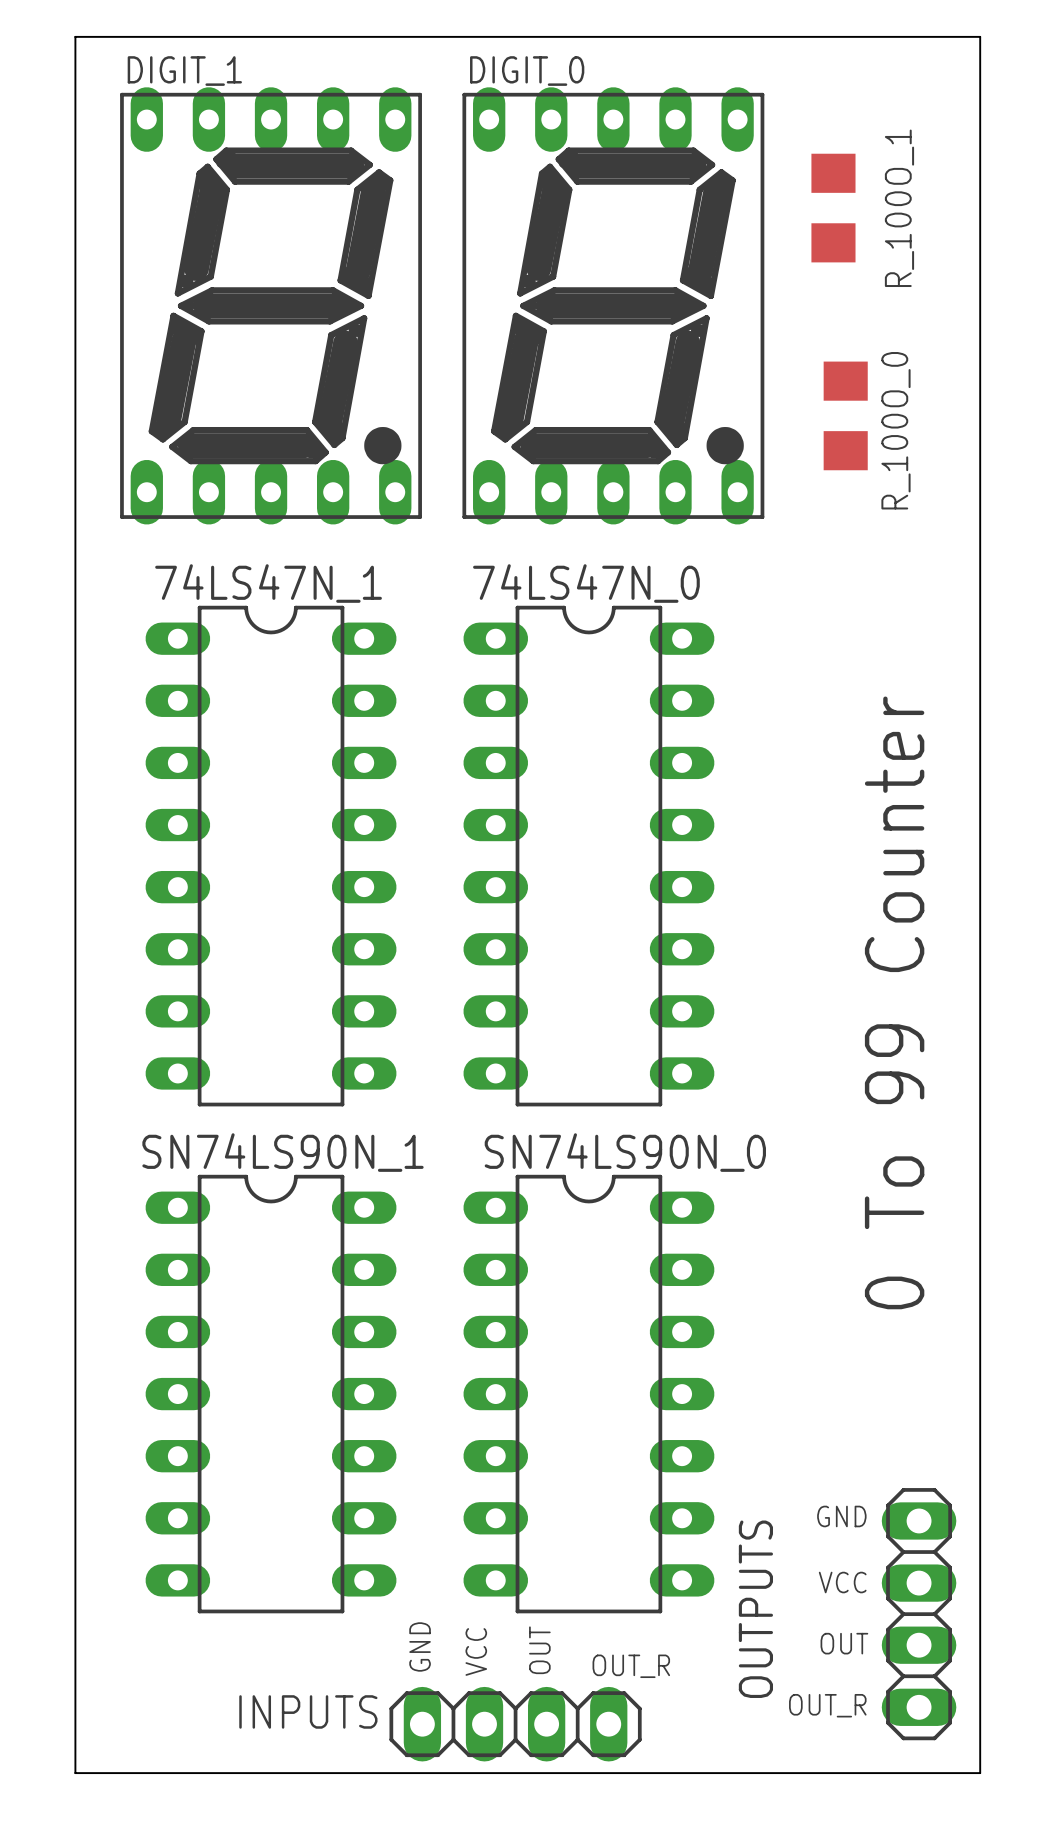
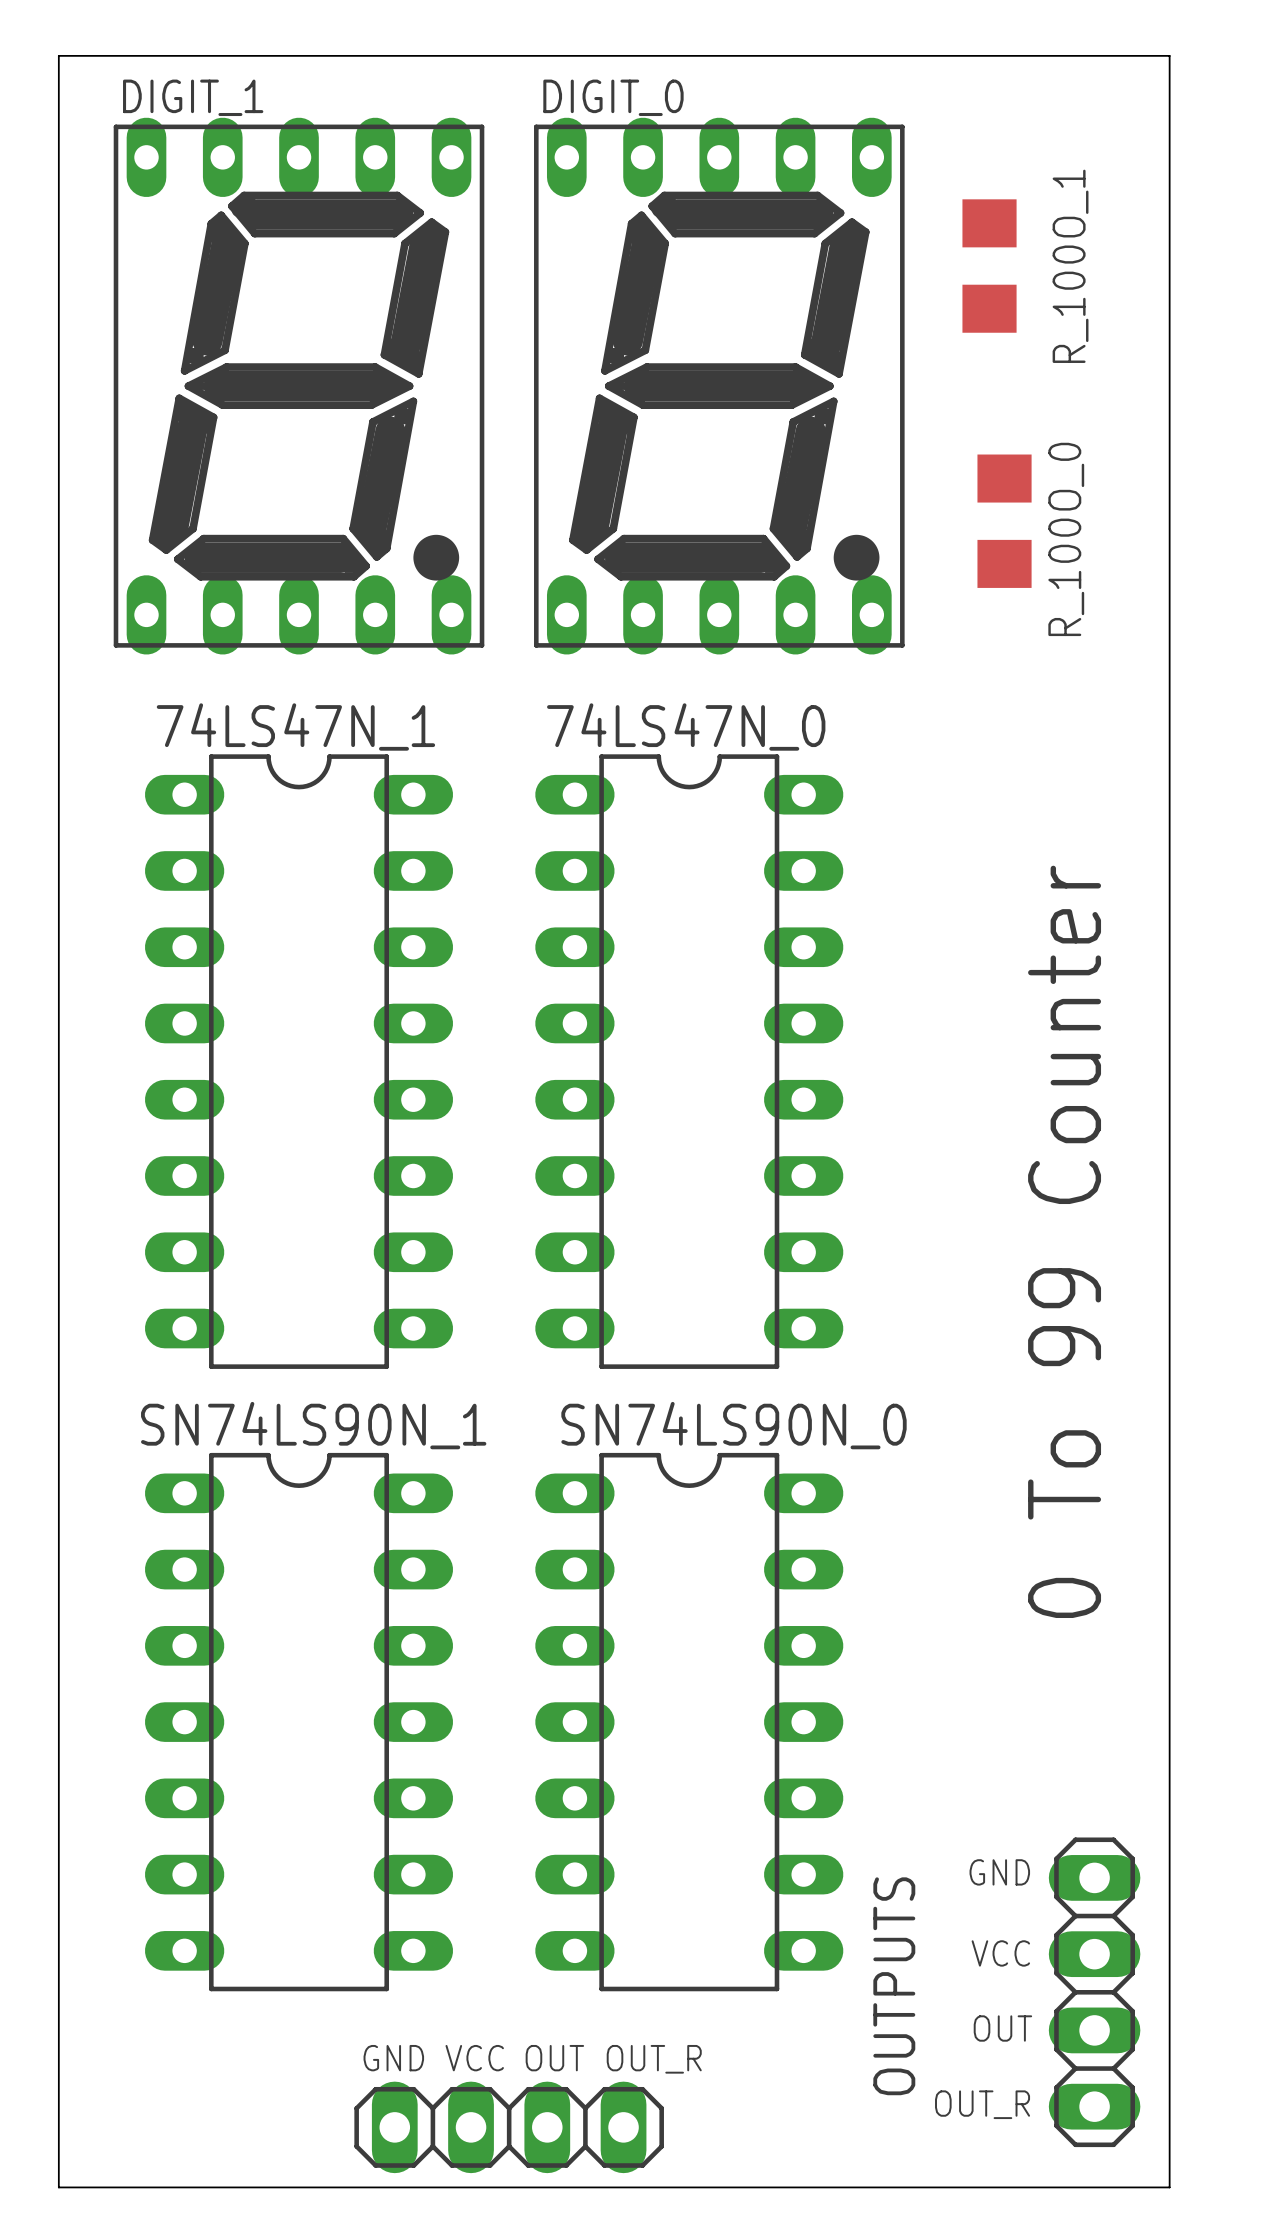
text rotation: 0° (420, 1646) -> 90° clockwise (393, 2058)
text position: GND (420, 1646) -> GND (393, 2058)
text rotation: 0° (539, 1650) -> 90° clockwise (554, 2058)
text rotation: 0° (476, 1651) -> 90° clockwise (474, 2058)
text position: OUT_R (631, 1666) -> OUT_R (654, 2059)
text: INPUTS (308, 1711) -> none
part position: (515, 1724) -> (509, 2127)

